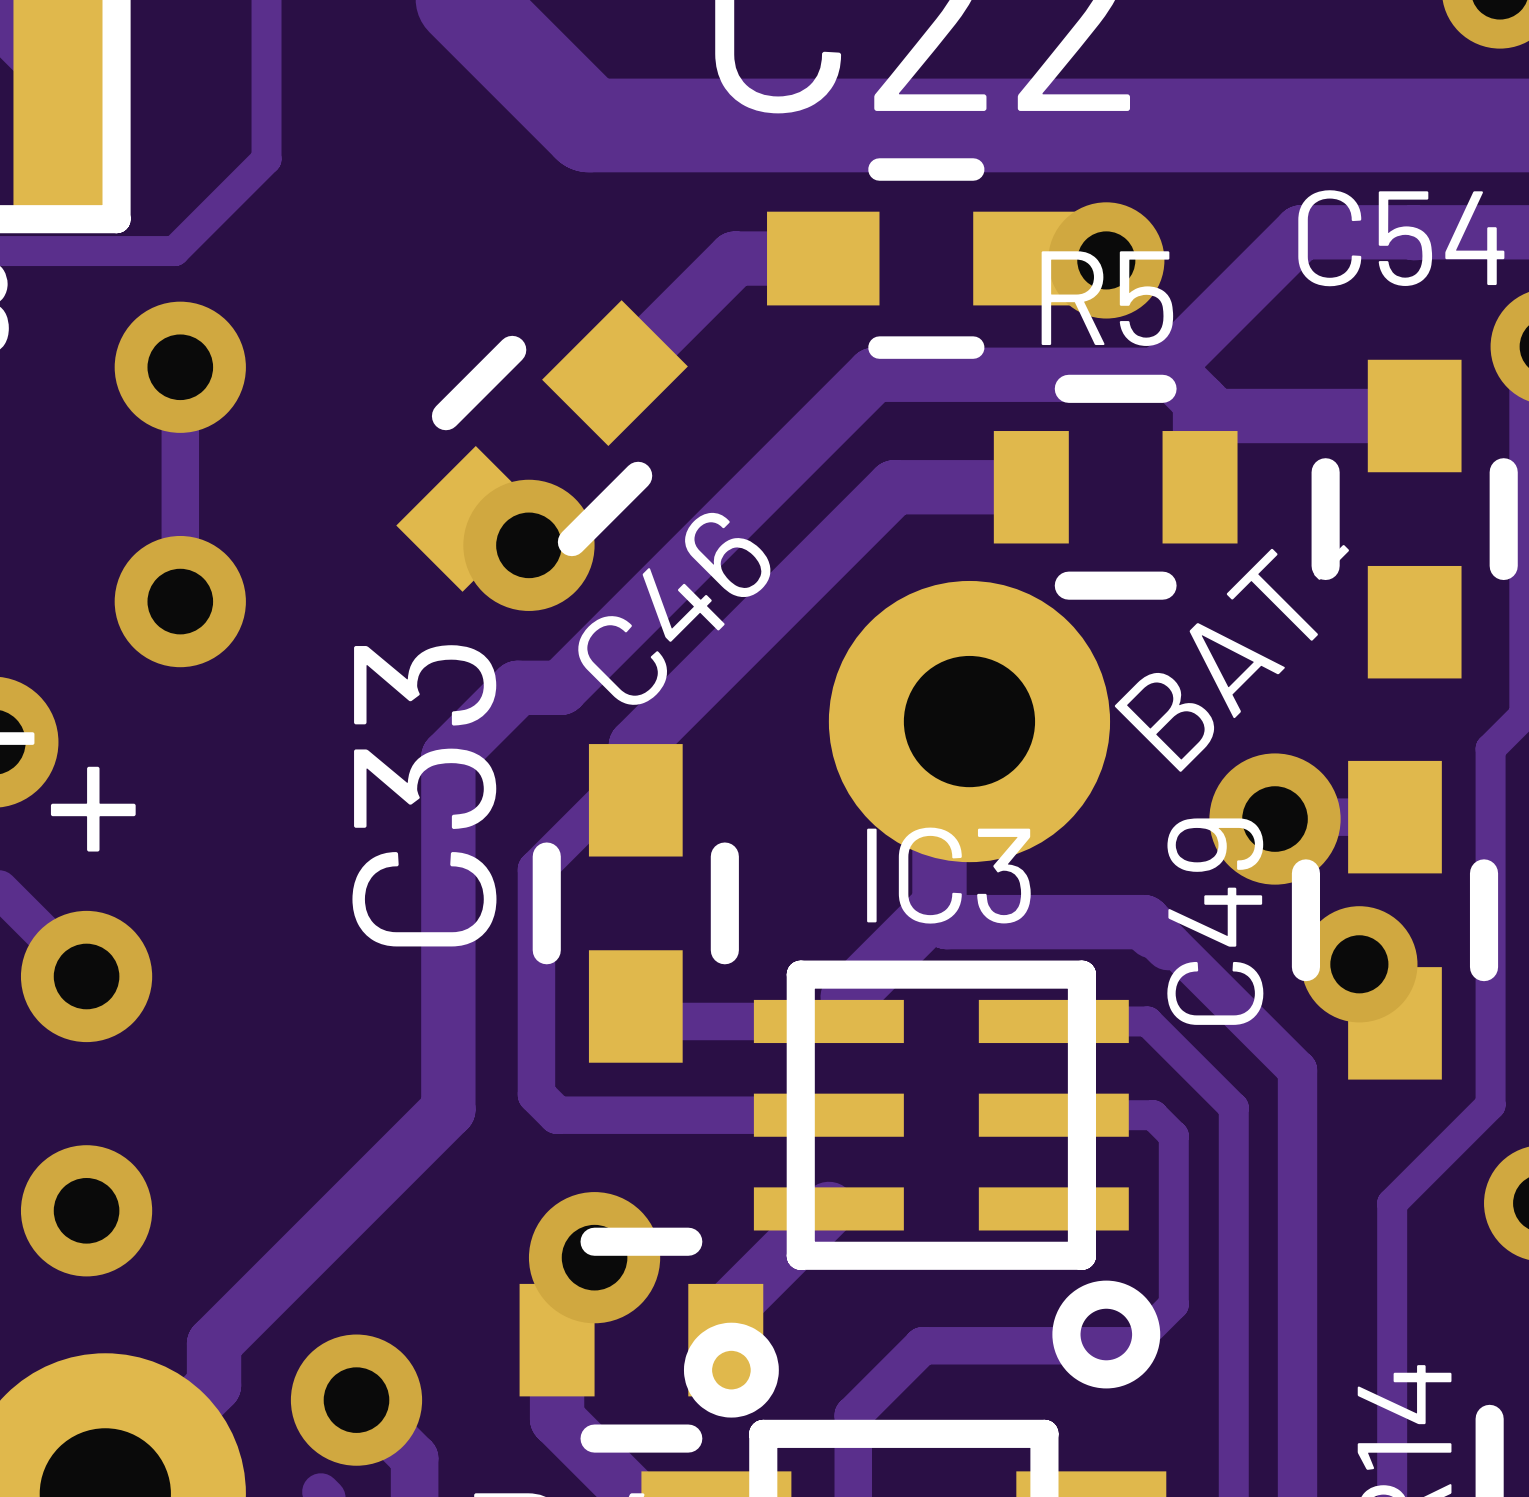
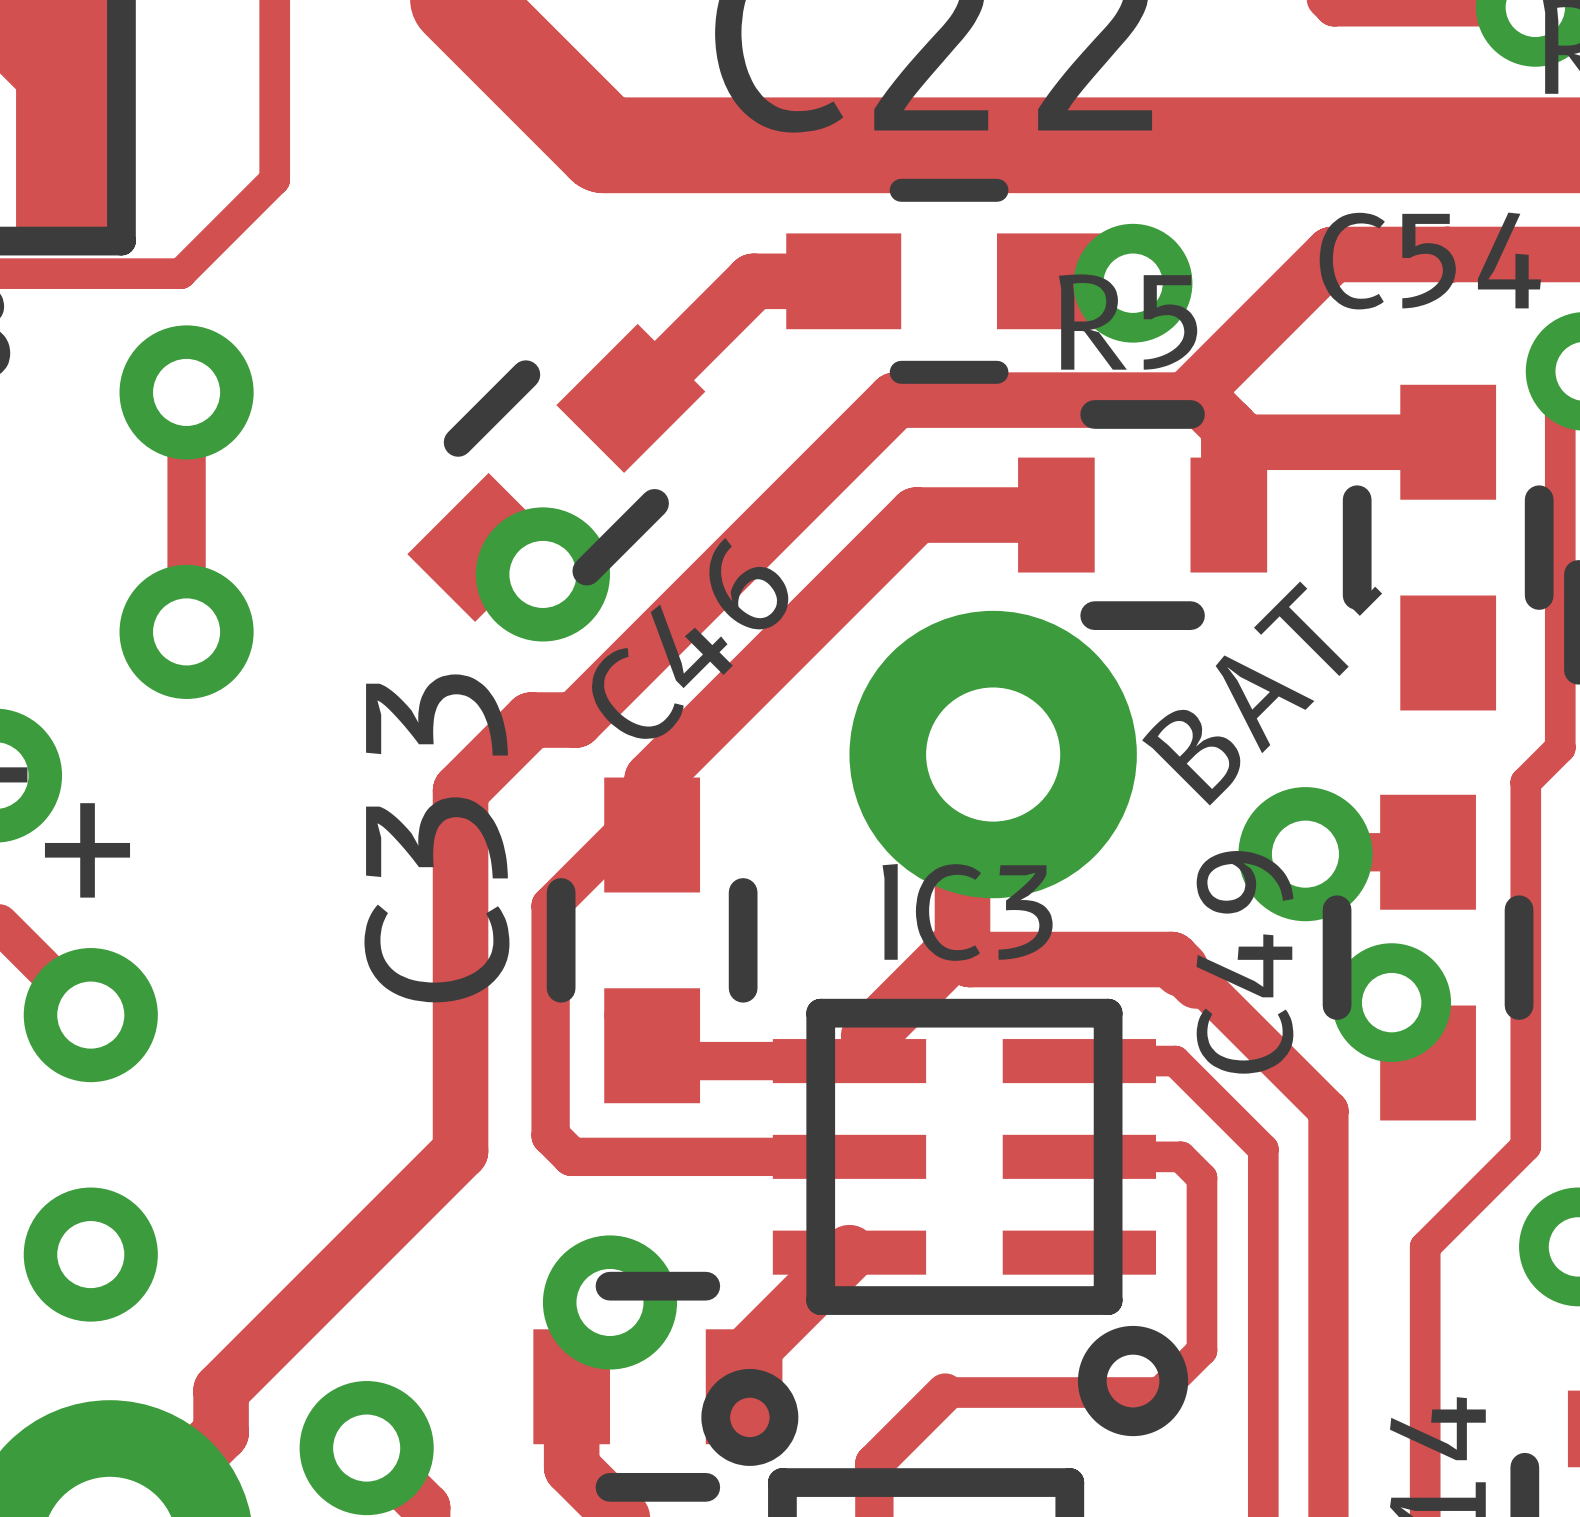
track width: thick (922, 1345) (1132, 1345) -> thin (945, 1392) (1159, 1392)

